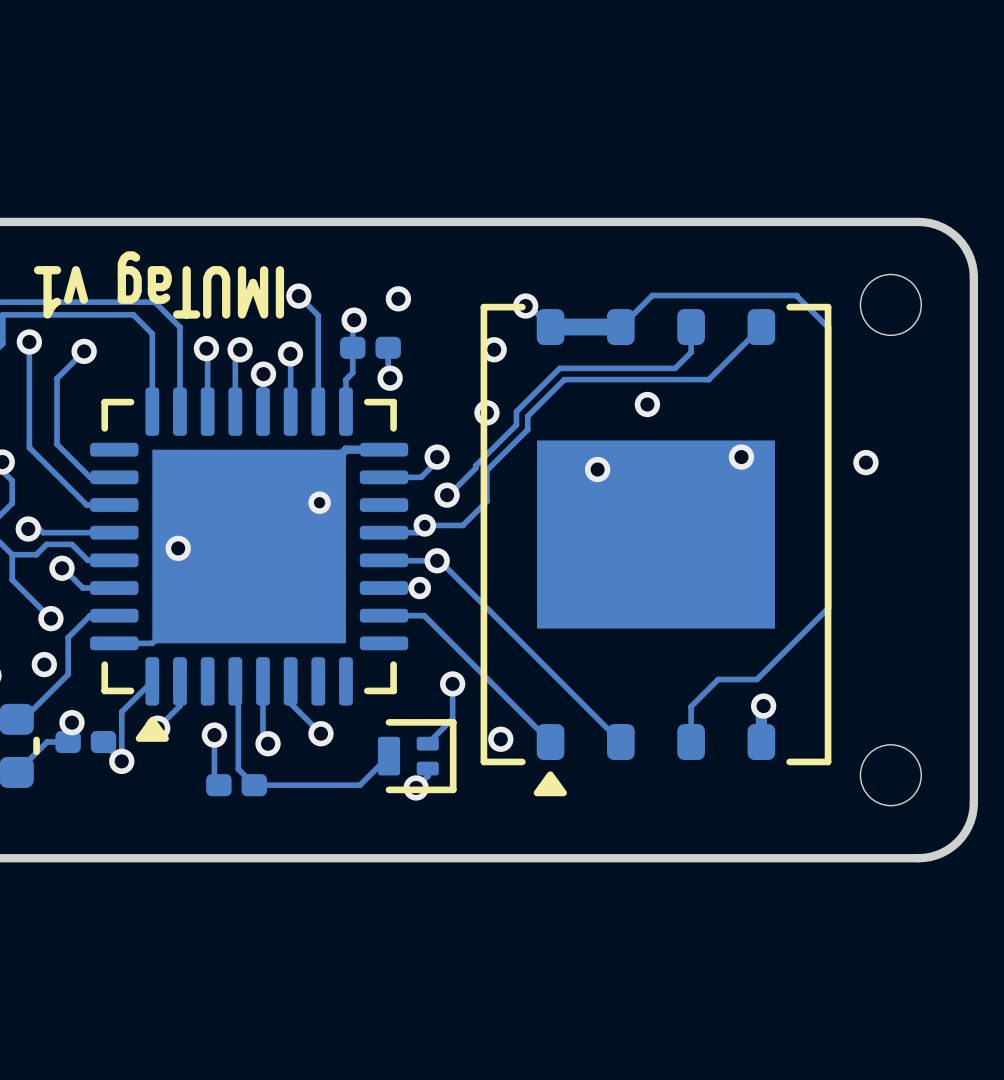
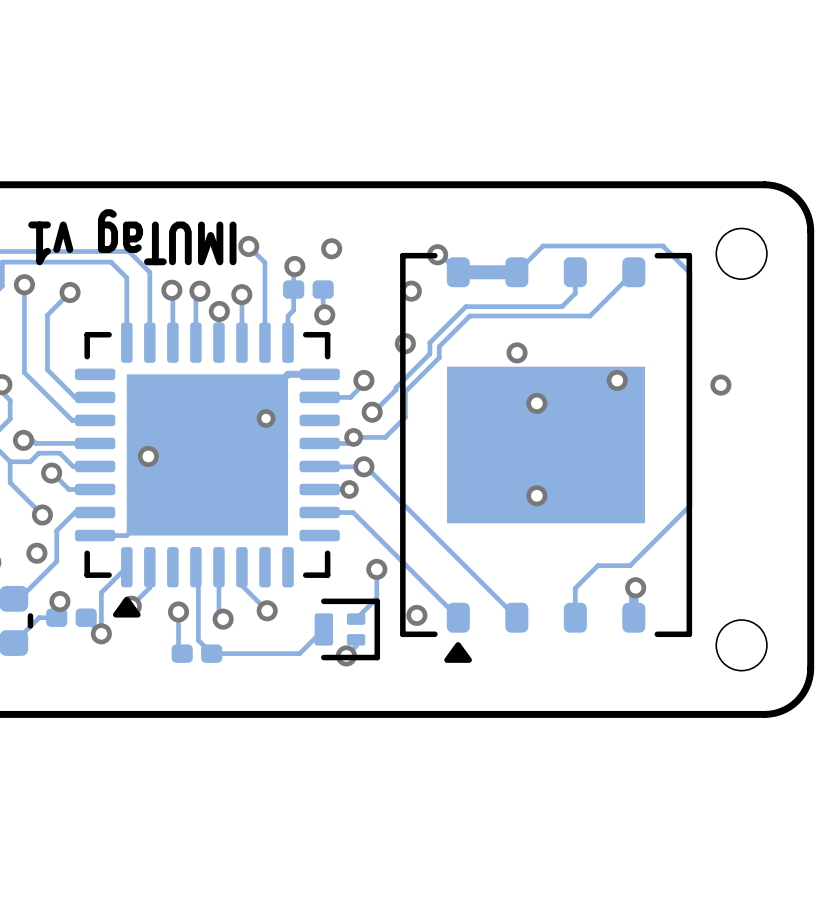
via: (647, 404) -> none
via: none -> (517, 352)
via: (597, 469) -> none
via: none -> (536, 403)
via: none -> (536, 495)

